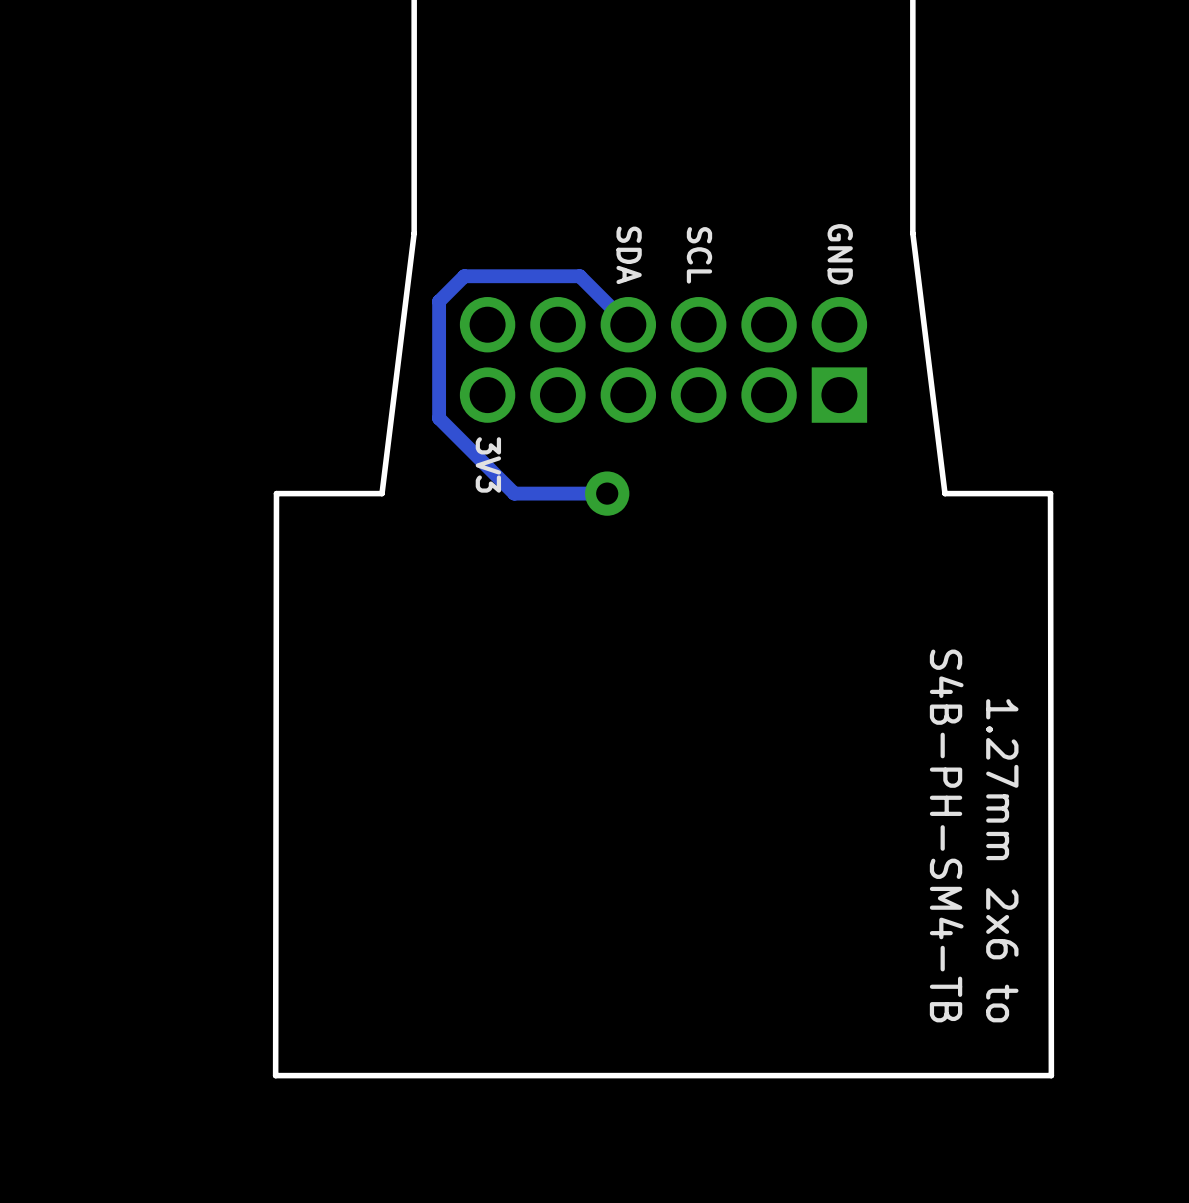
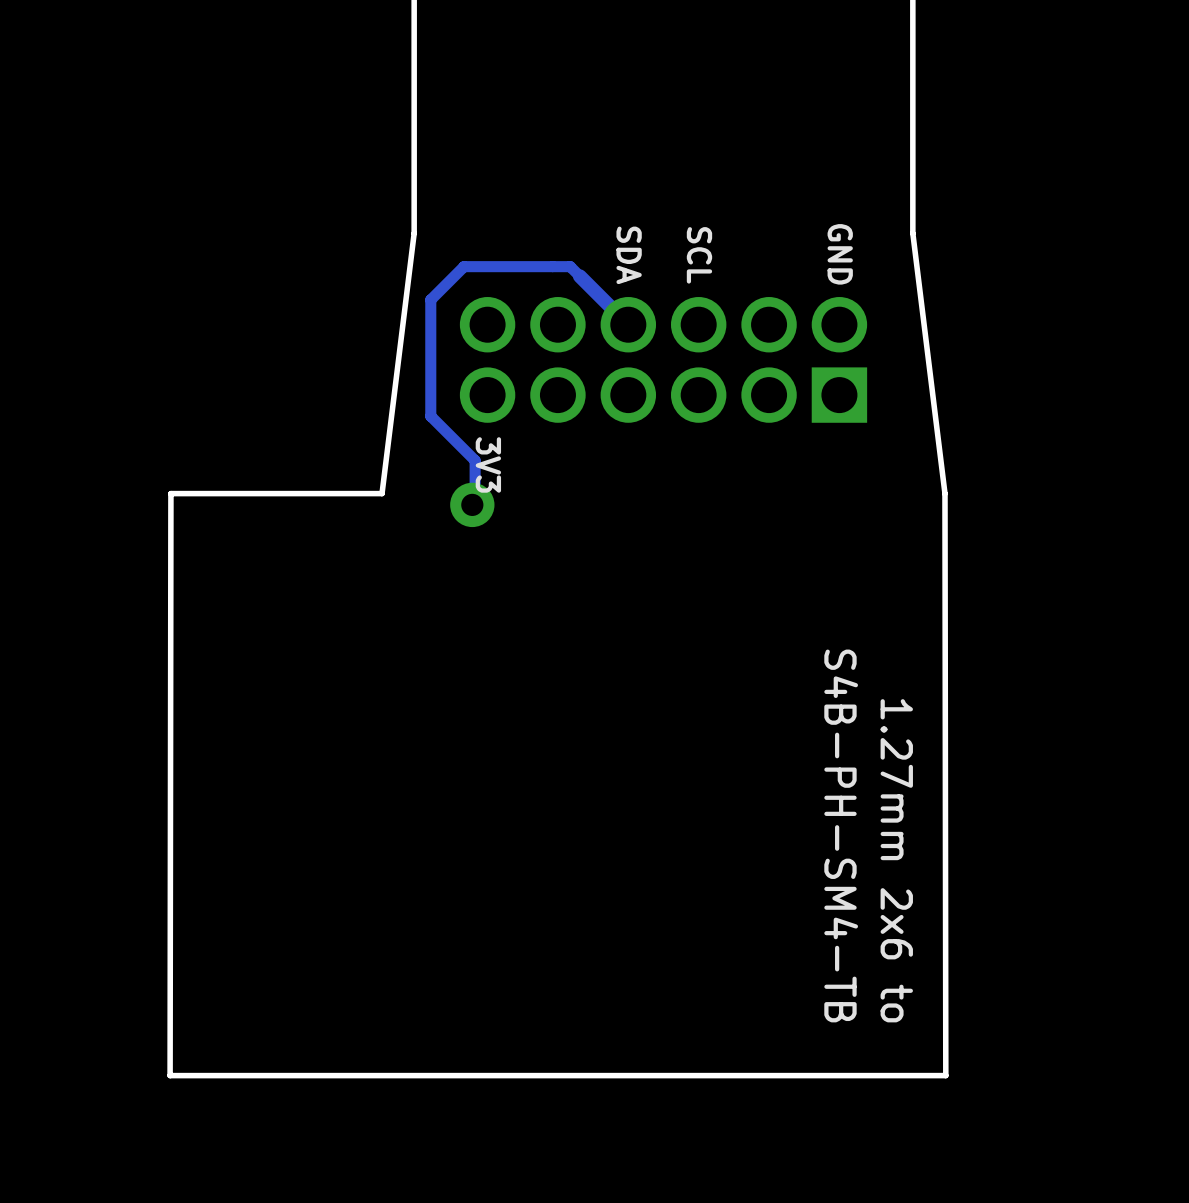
track: (579, 276) (464, 276) (439, 301) (439, 418) (514, 493) (607, 493) -> (579, 276) (570, 266) (464, 266) (430, 299) (430, 416) (475, 460) (475, 502) (472, 504)
board edge: (276, 493) (275, 1075) -> (276, 493) (170, 493) (170, 1075) (275, 1075)
via position: (607, 493) -> (472, 504)
board edge: (944, 493) (1050, 493) (1051, 1075) (945, 1075) -> (944, 493) (945, 1075)
text position: S4B-PH-SM4-TB (946, 835) -> S4B-PH-SM4-TB (841, 835)
text position: 1.27mm 2x6 to (1002, 860) -> 1.27mm 2x6 to (896, 860)

